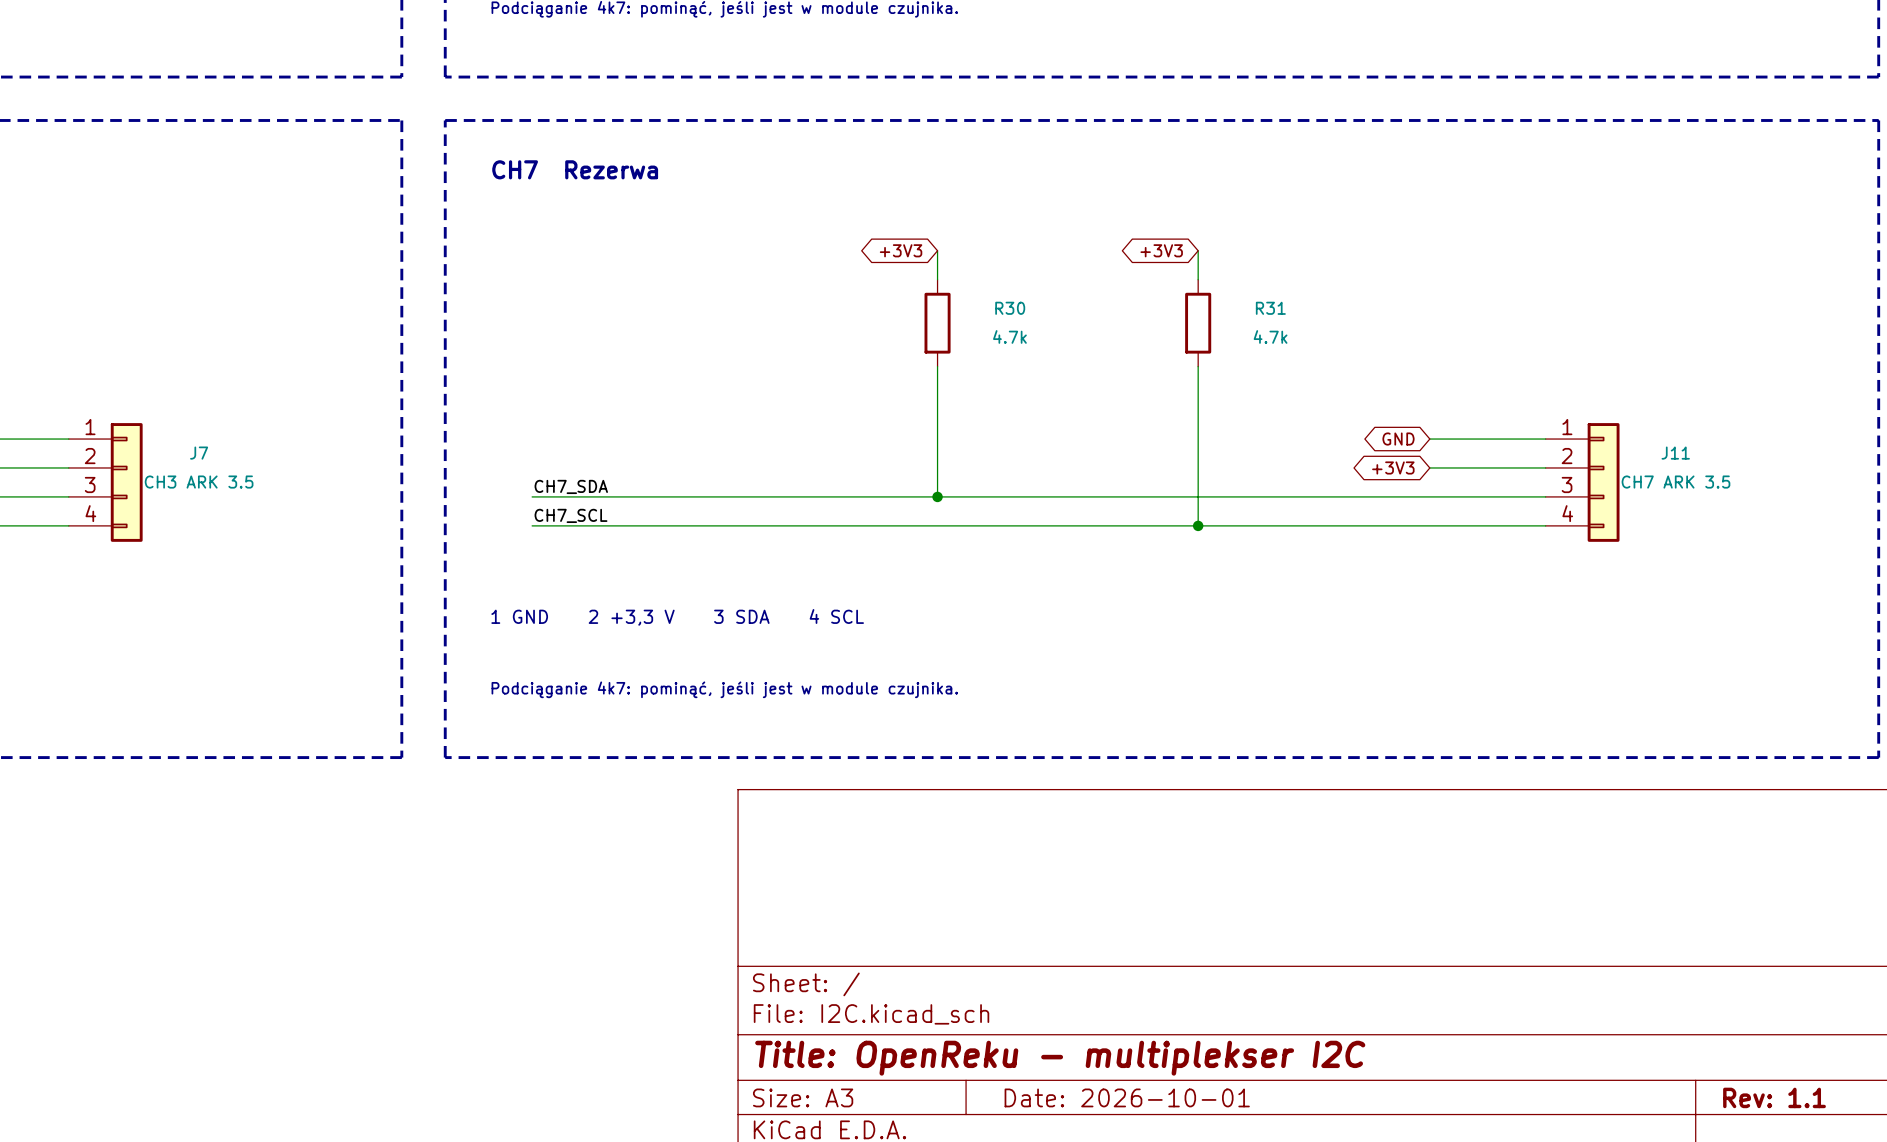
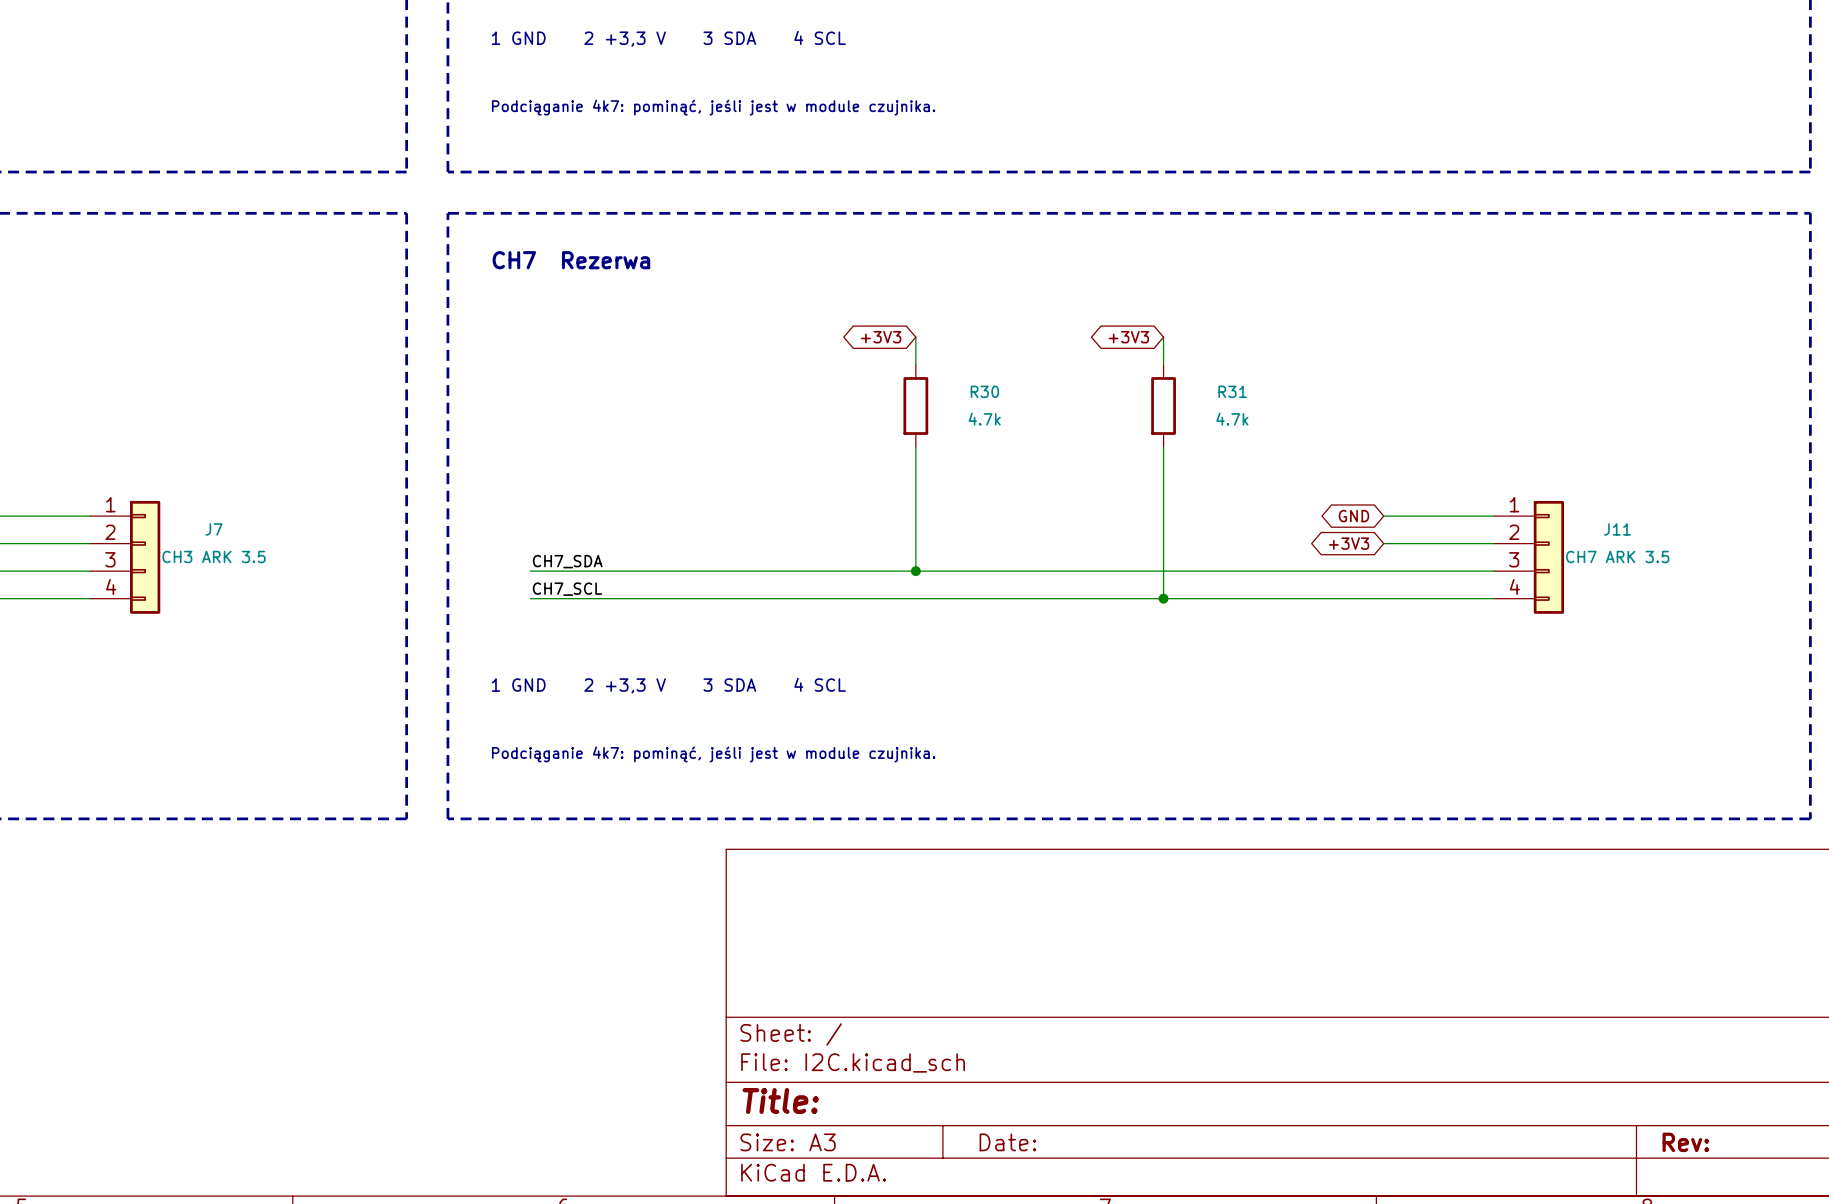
title block: Title: OpenReku - multiplekser I2C (1060, 1058) -> Title: (780, 1100)
title block: Date: 2026-10-01 (1127, 1097) -> Date: (1007, 1142)
title block: Rev: 1.1 (1774, 1097) -> Rev: (1685, 1142)

